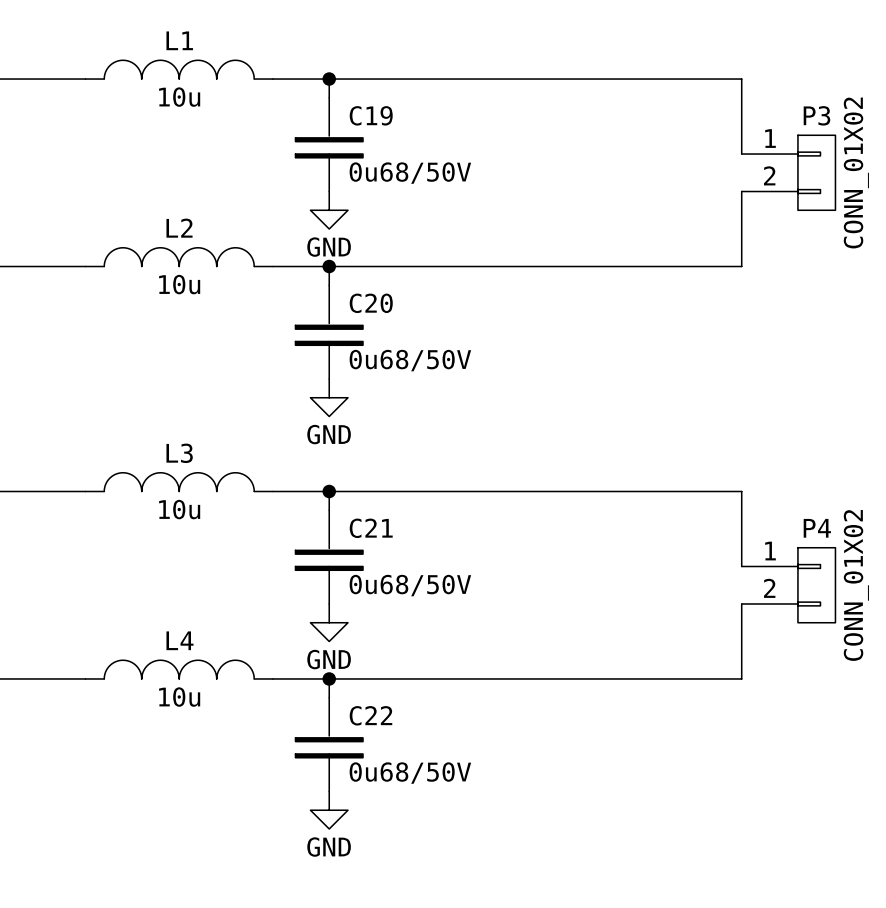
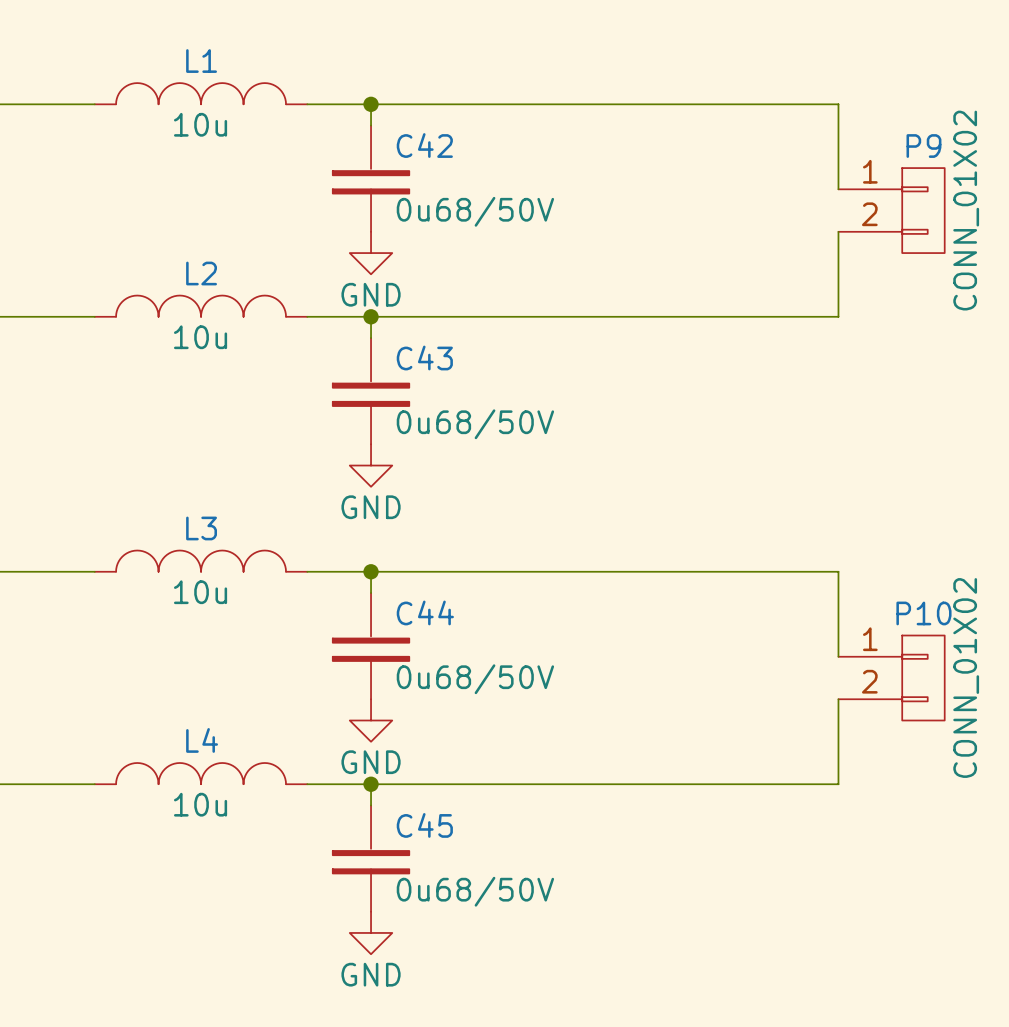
C19 name: C19 (371, 115) -> C42 (424, 145)
P3 name: P3 (816, 115) -> P9 (923, 146)
C20 name: C20 (371, 303) -> C43 (424, 357)
C21 name: C21 (371, 528) -> C44 (425, 612)
P4 name: P4 (817, 528) -> P10 (923, 613)
C22 name: C22 (370, 715) -> C45 (424, 825)

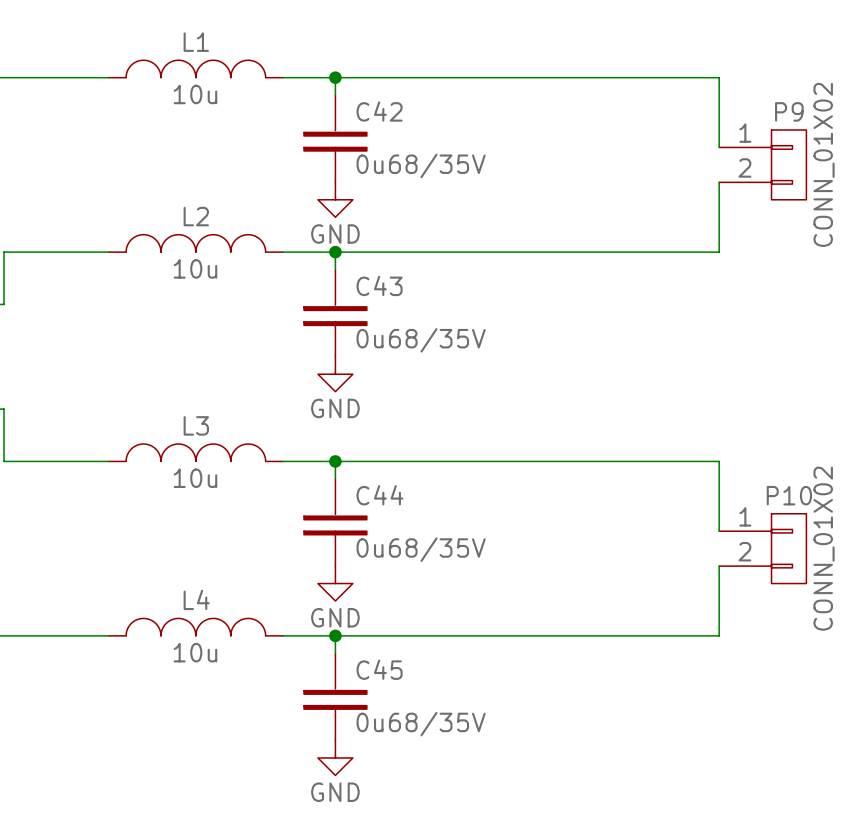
C42 value: 0u68/50V (475, 211) -> 0u68/35V (421, 165)
C43 value: 0u68/50V (475, 424) -> 0u68/35V (421, 340)
C44 value: 0u68/50V (475, 679) -> 0u68/35V (421, 549)
C45 value: 0u68/50V (475, 891) -> 0u68/35V (421, 724)

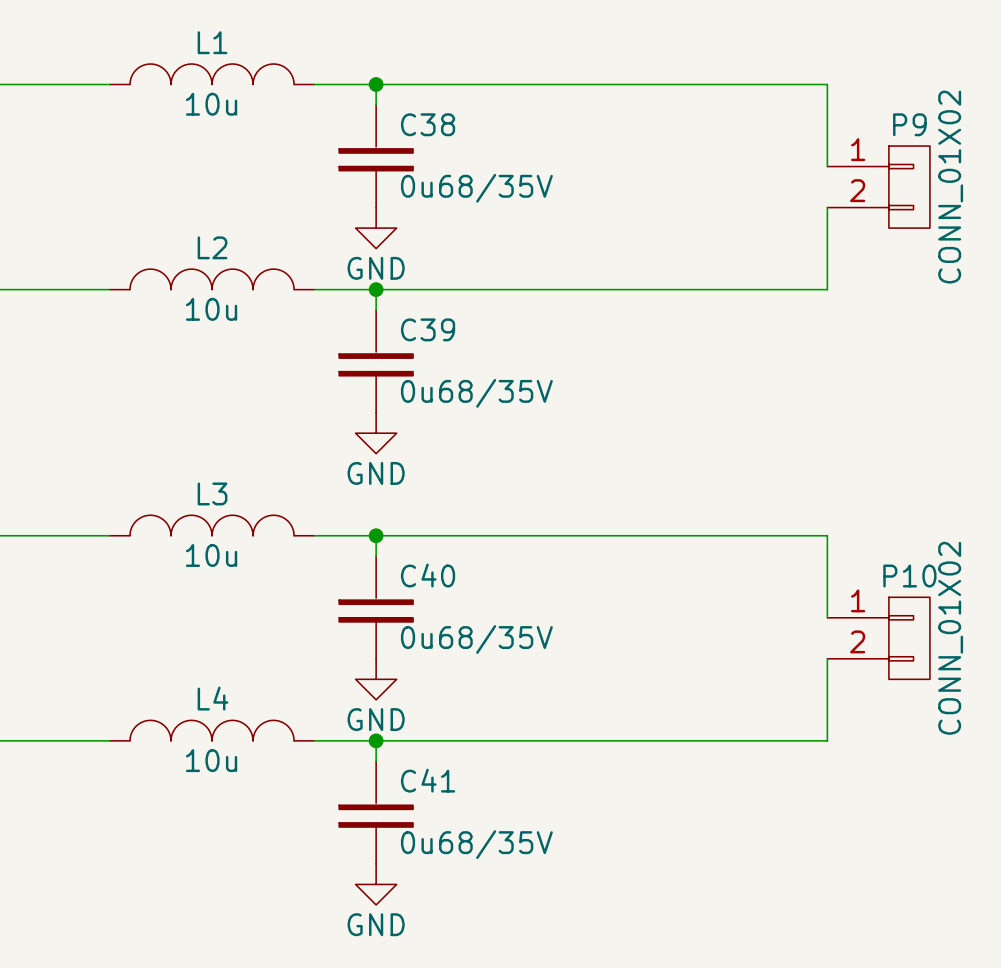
C42 name: C42 (379, 111) -> C38 (428, 124)
C43 name: C43 (379, 285) -> C39 (428, 329)
C44 name: C44 (379, 495) -> C40 (428, 575)
C45 name: C45 (379, 669) -> C41 (428, 780)

